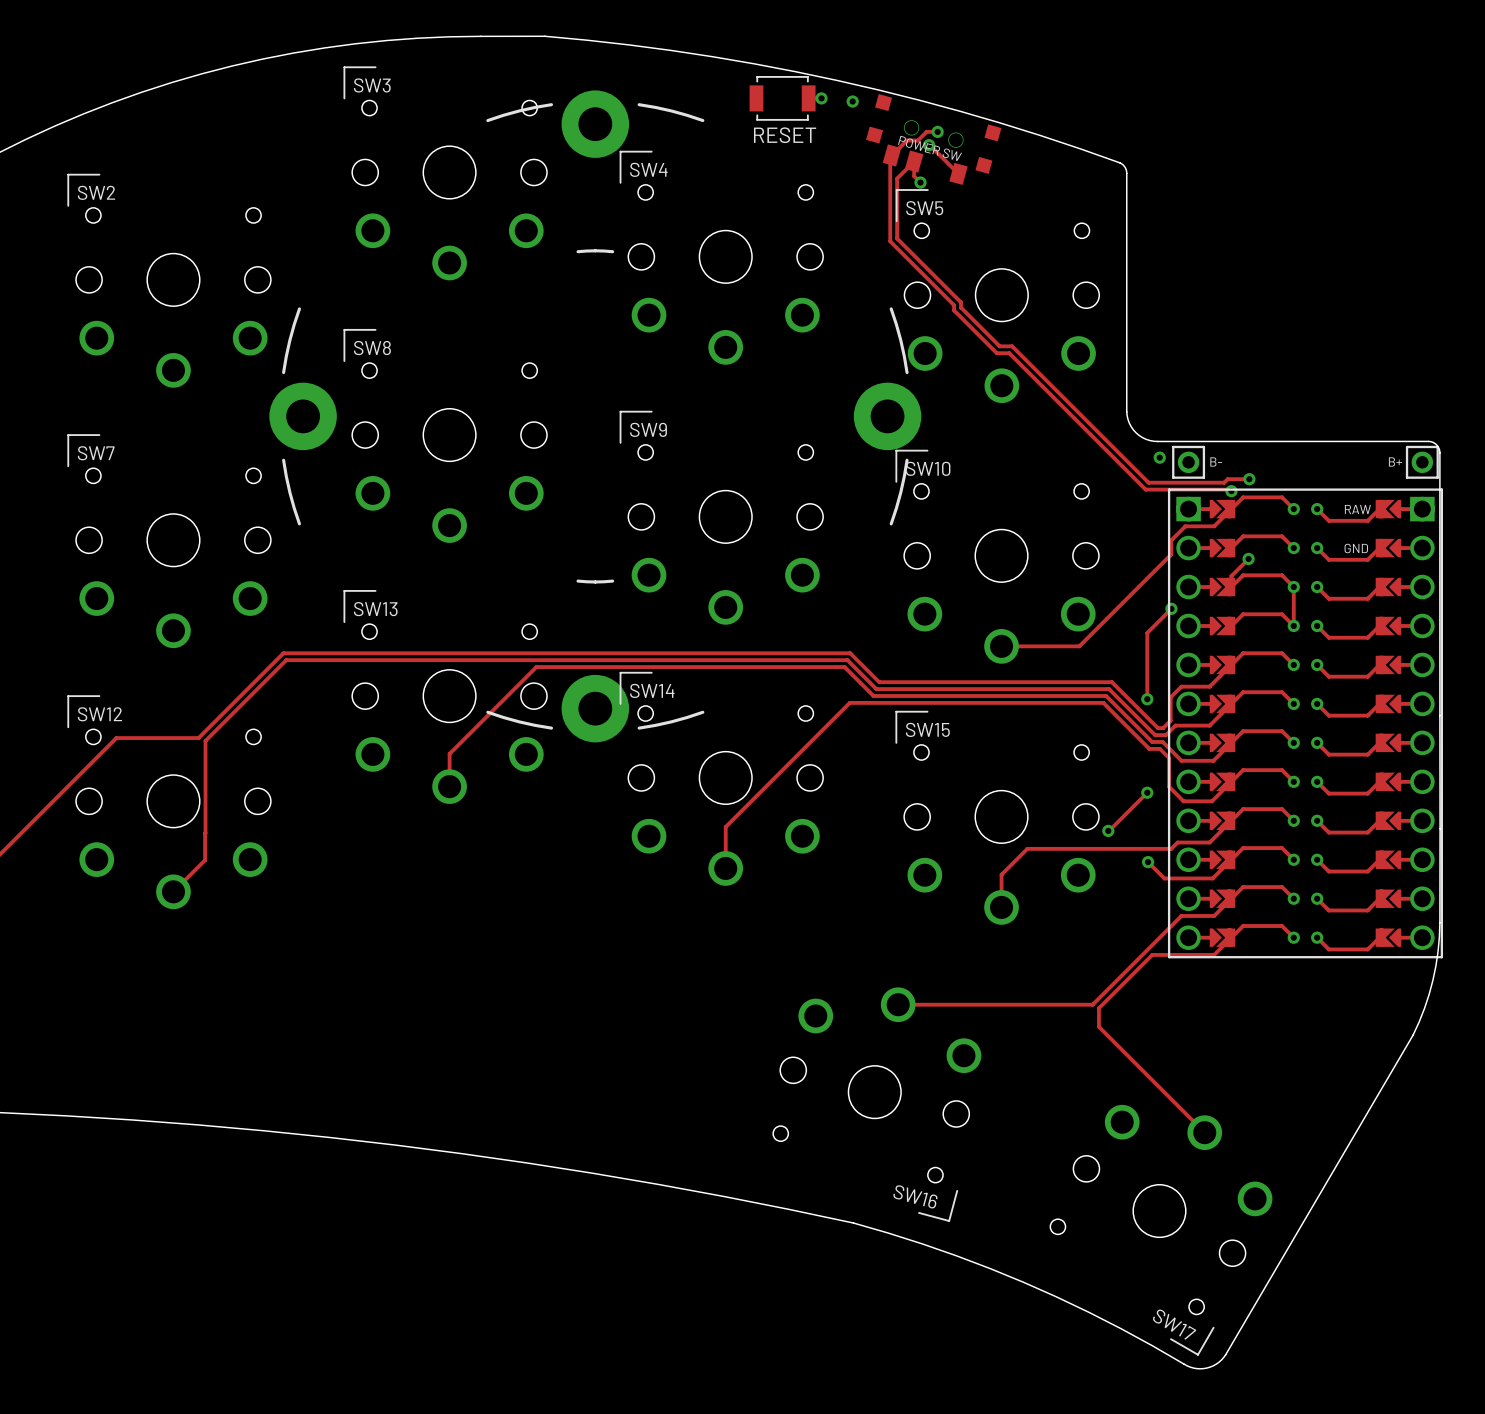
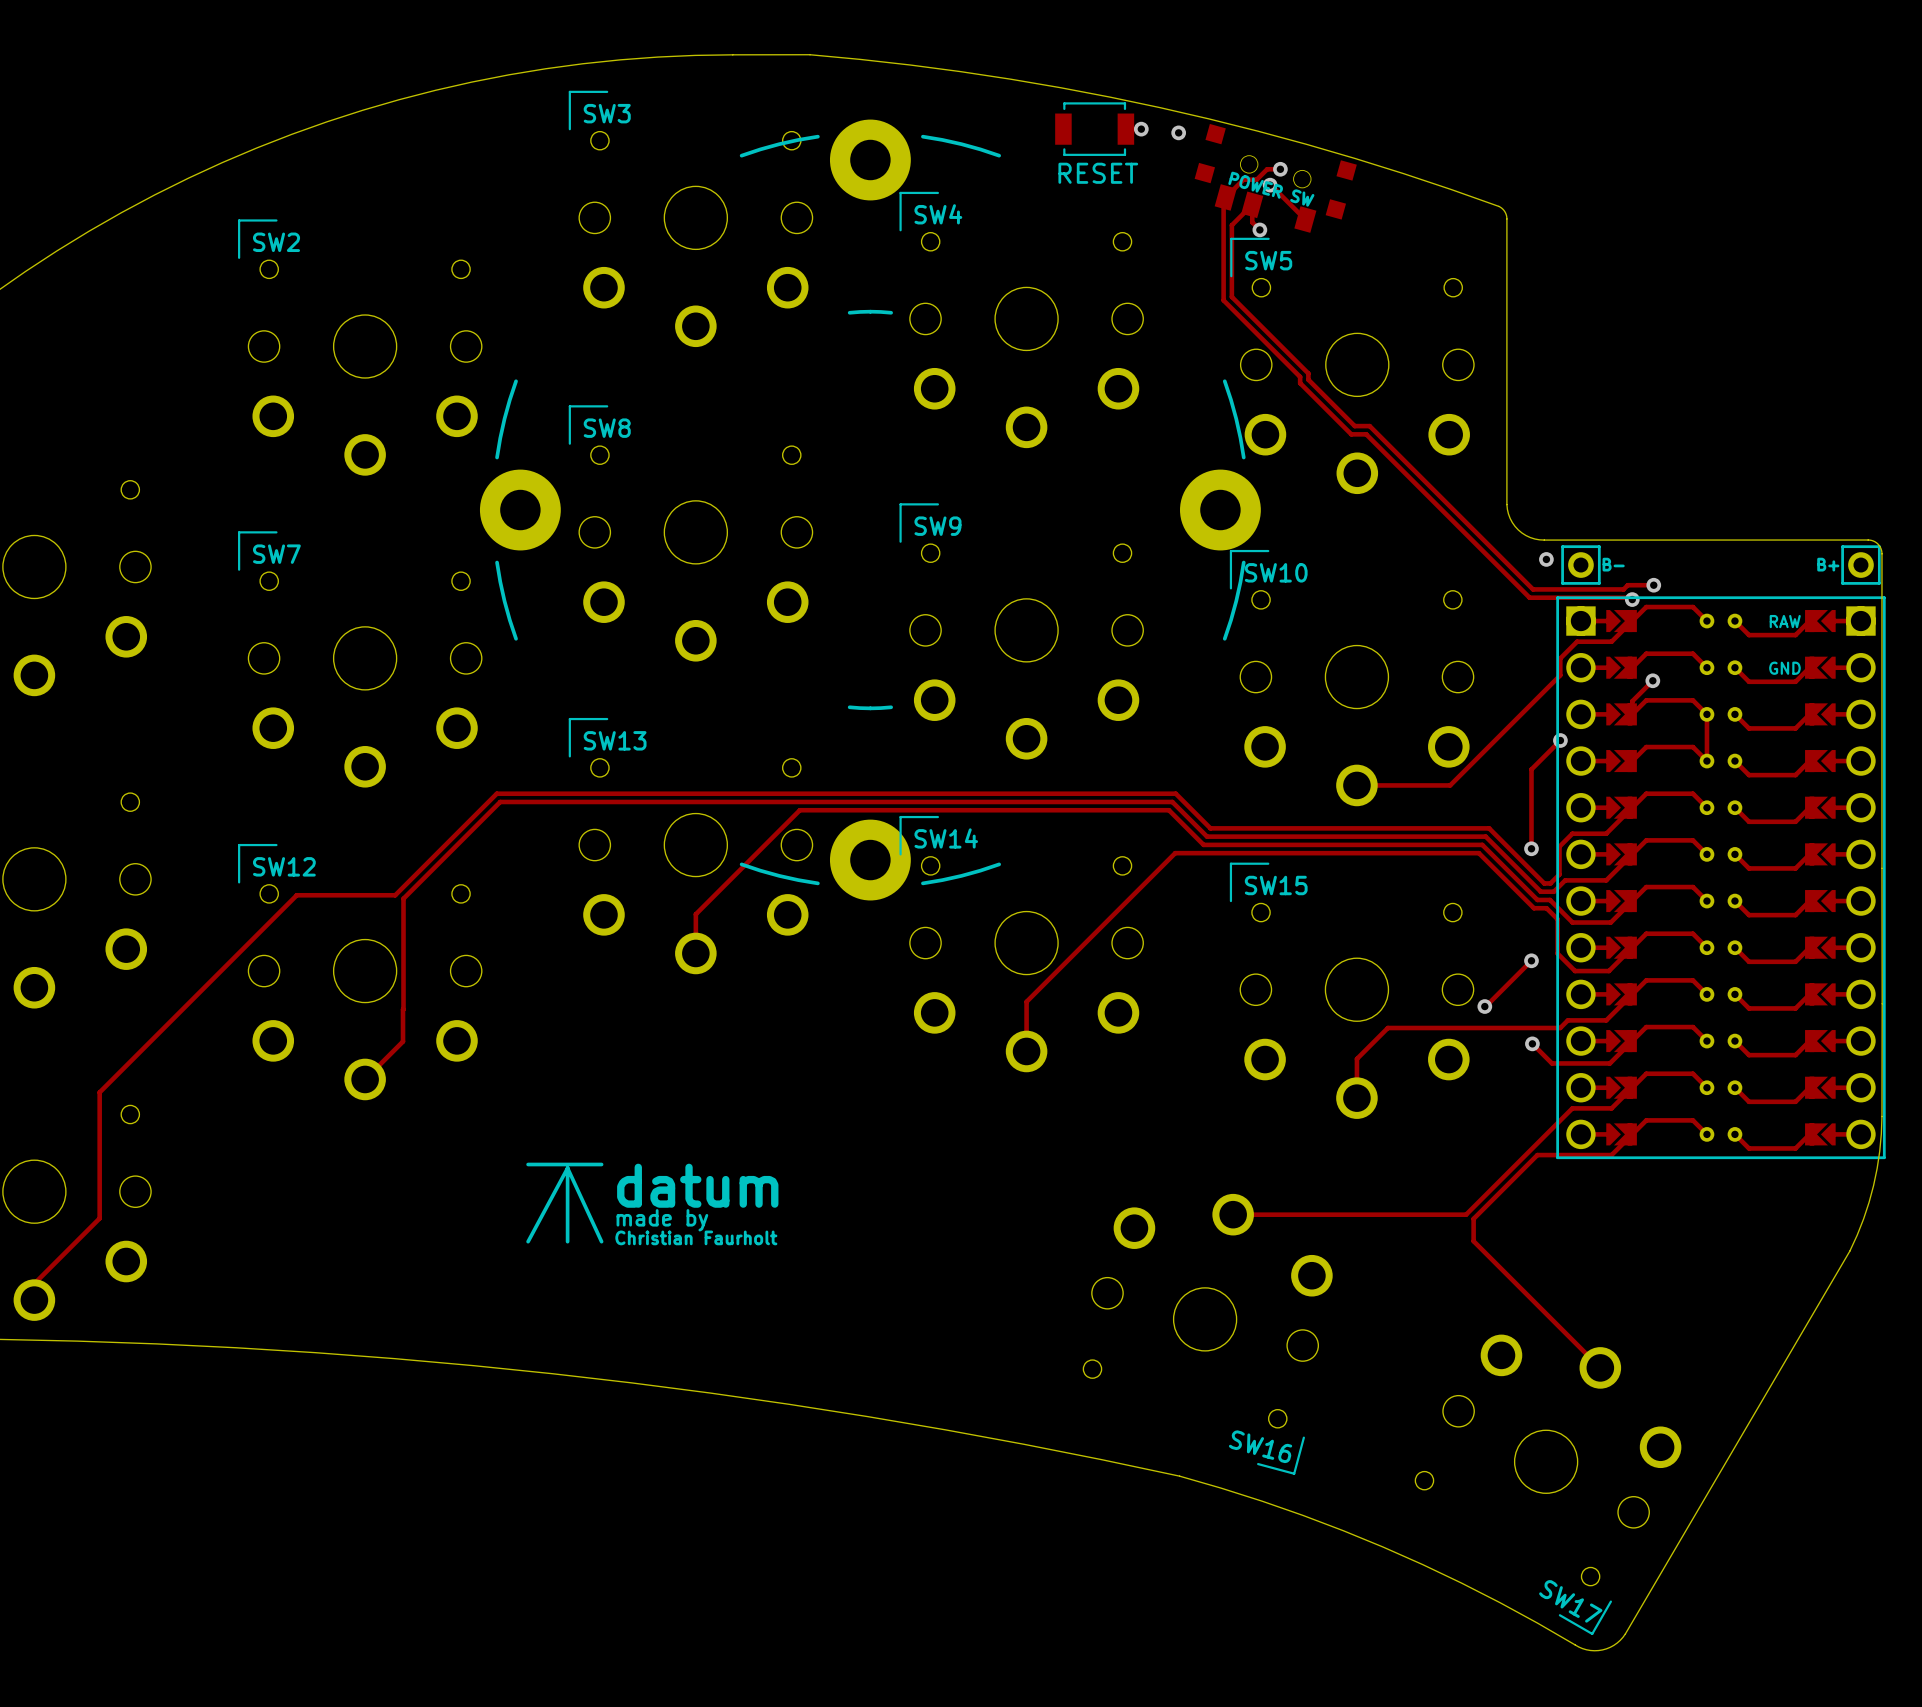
line: none -> (528, 1164) (601, 1164)
line: none -> (567, 1168) (528, 1241)
line: none -> (567, 1168) (567, 1241)
line: none -> (567, 1168) (601, 1241)
text: none -> datum (697, 1185)
text: none -> made by (662, 1220)
text: none -> Christian Faurholt (696, 1237)

